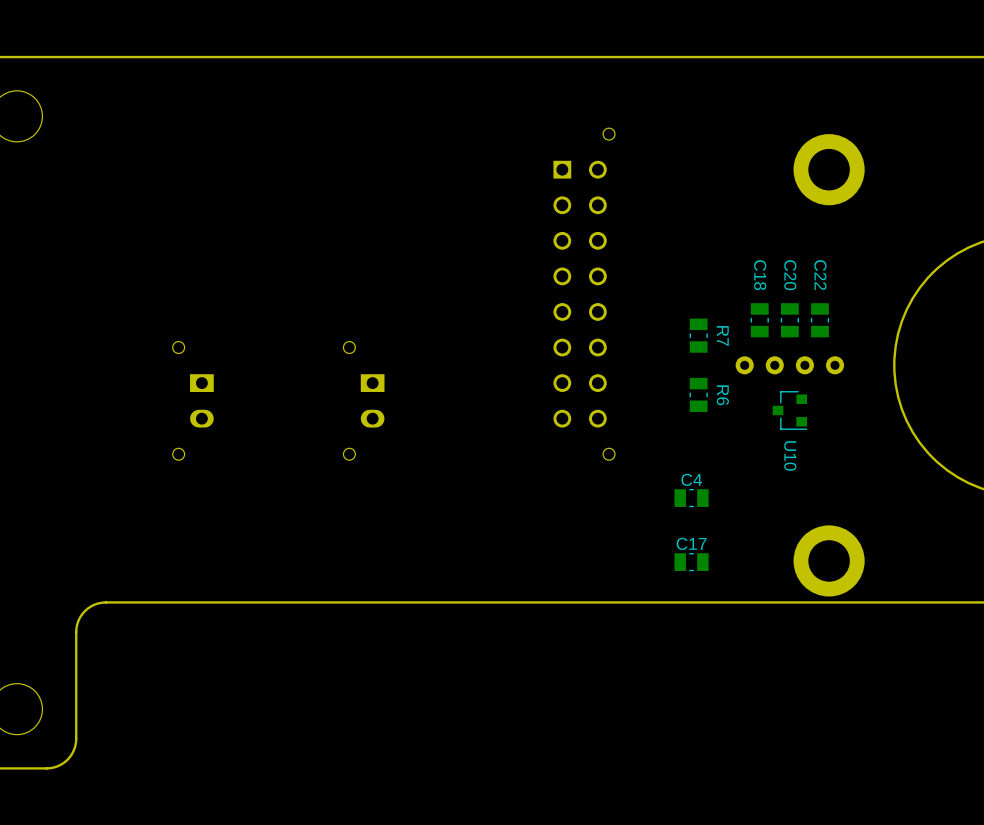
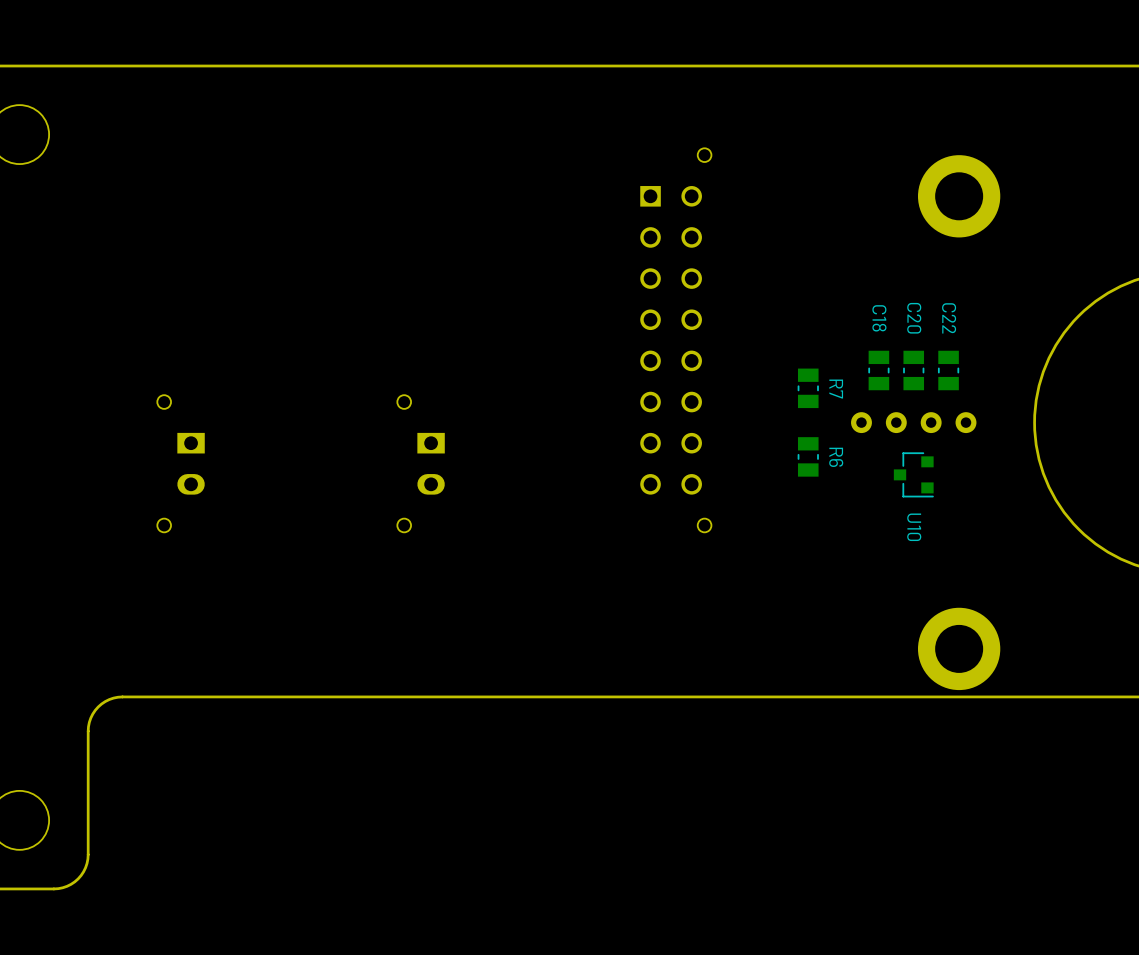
part position: (193, 400) -> (181, 463)
C4: (691, 498) -> none
C17: (691, 562) -> none

